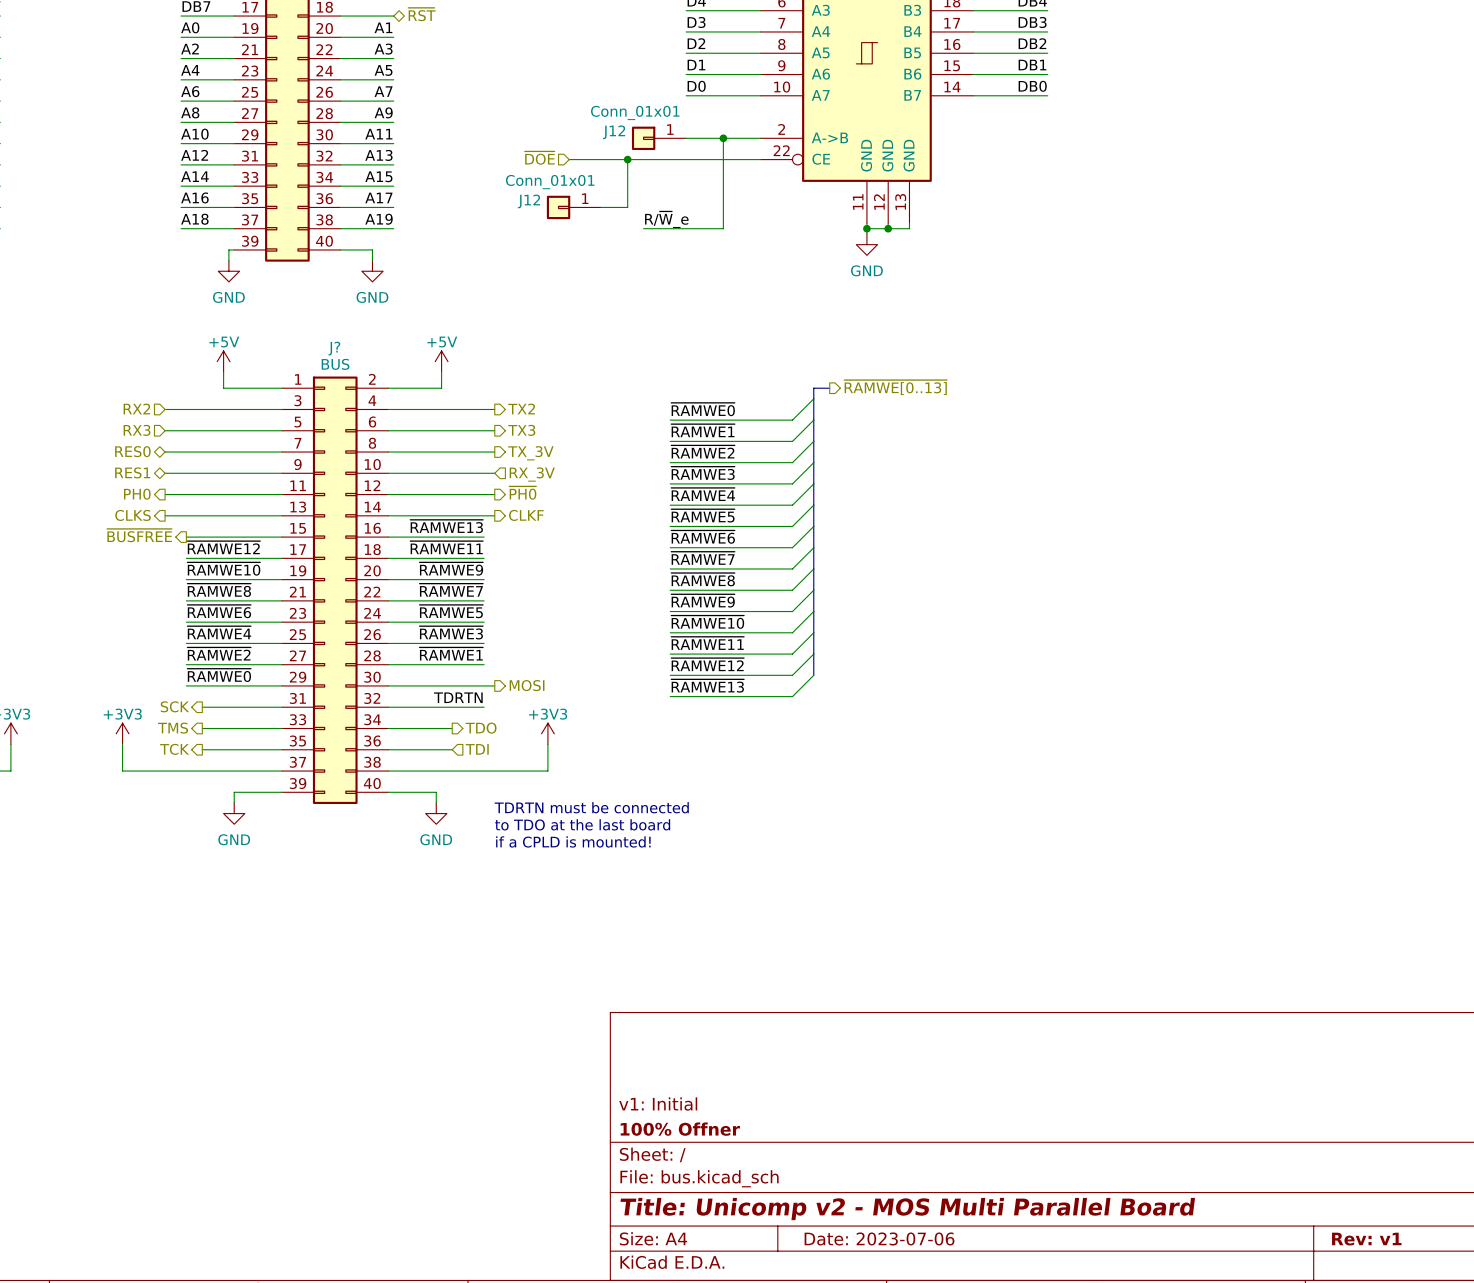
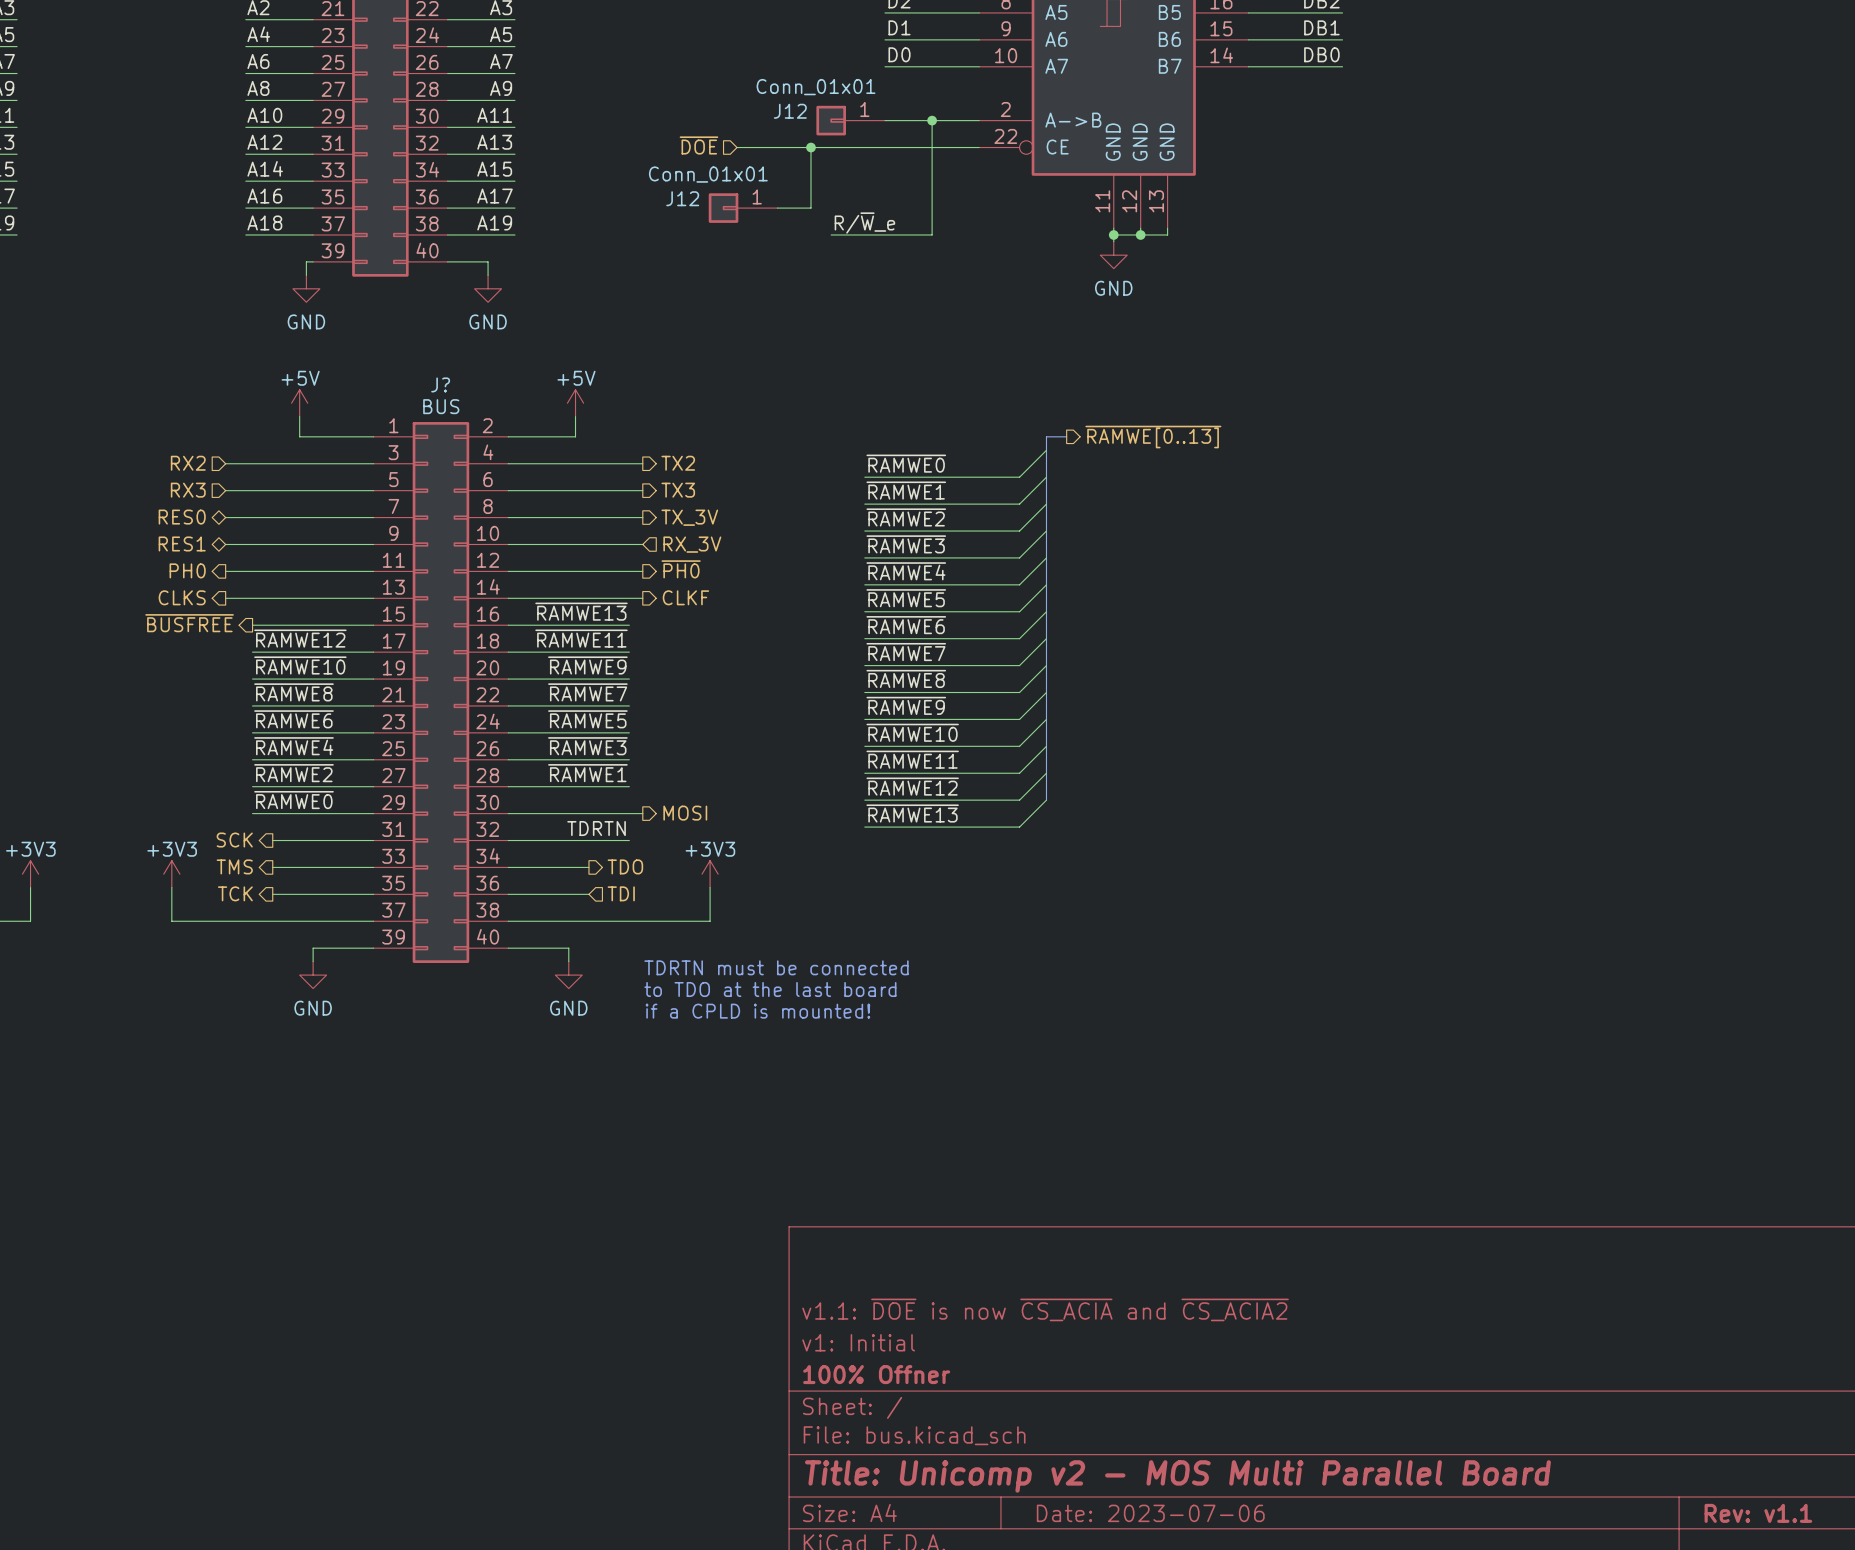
title block: none -> v1.1: ~{DOE} is now ~{CS_ACIA} and ~{CS_ACIA2} (1045, 1309)
title block: Rev: v1 (1366, 1239) -> Rev: v1.1 (1758, 1513)

